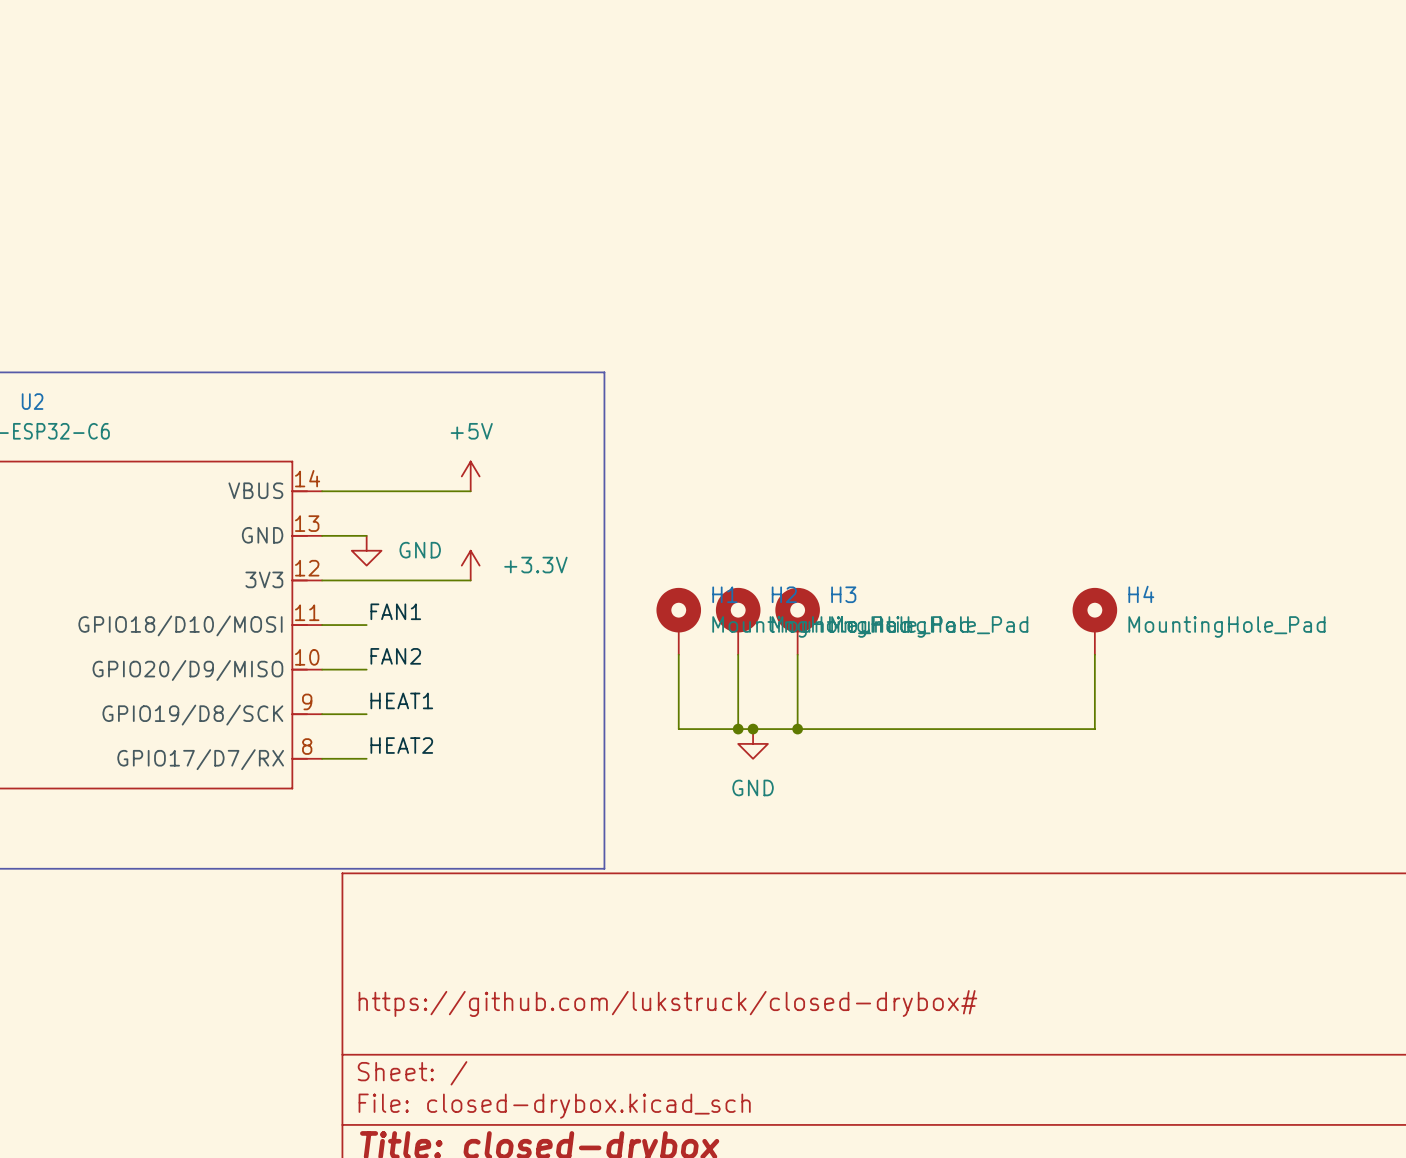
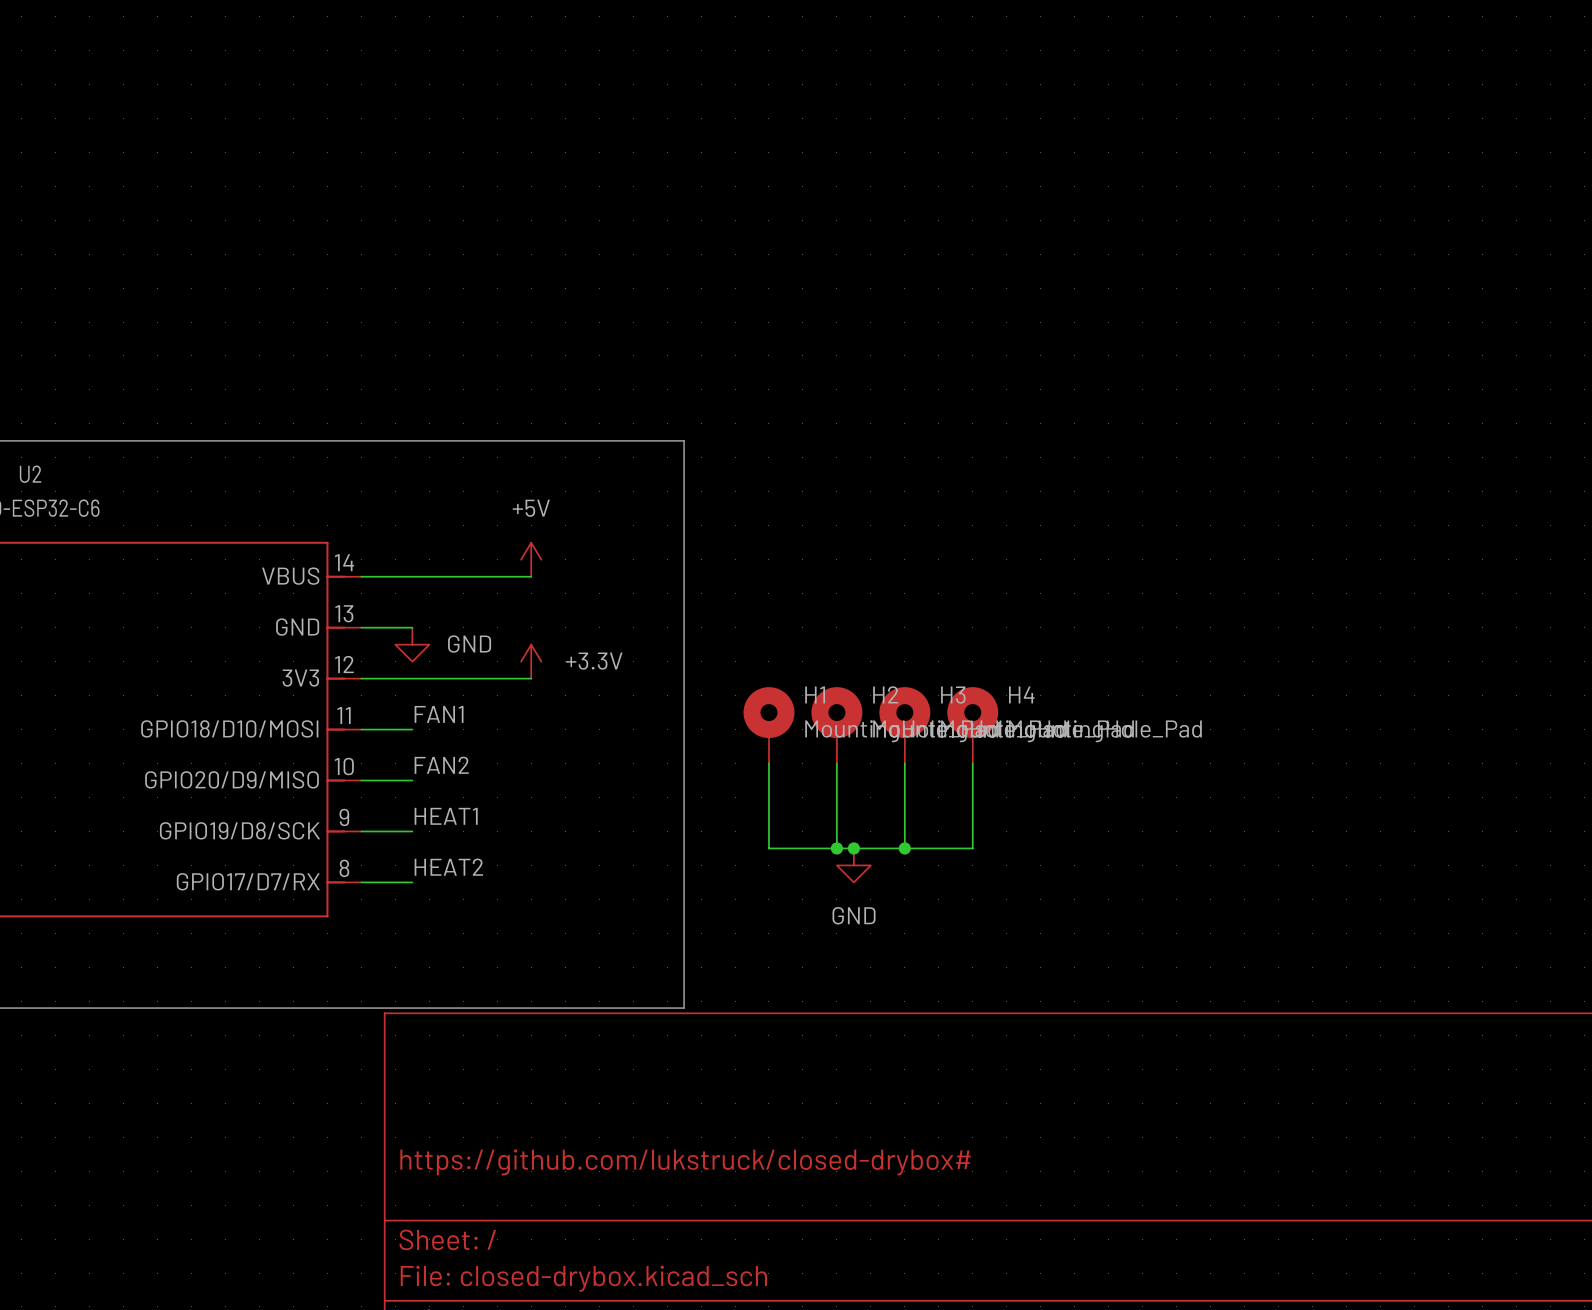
H4 position: (1094, 621) -> (972, 725)
wire: (1094, 654) (1094, 729) (857, 729) -> (972, 763) (972, 848)

